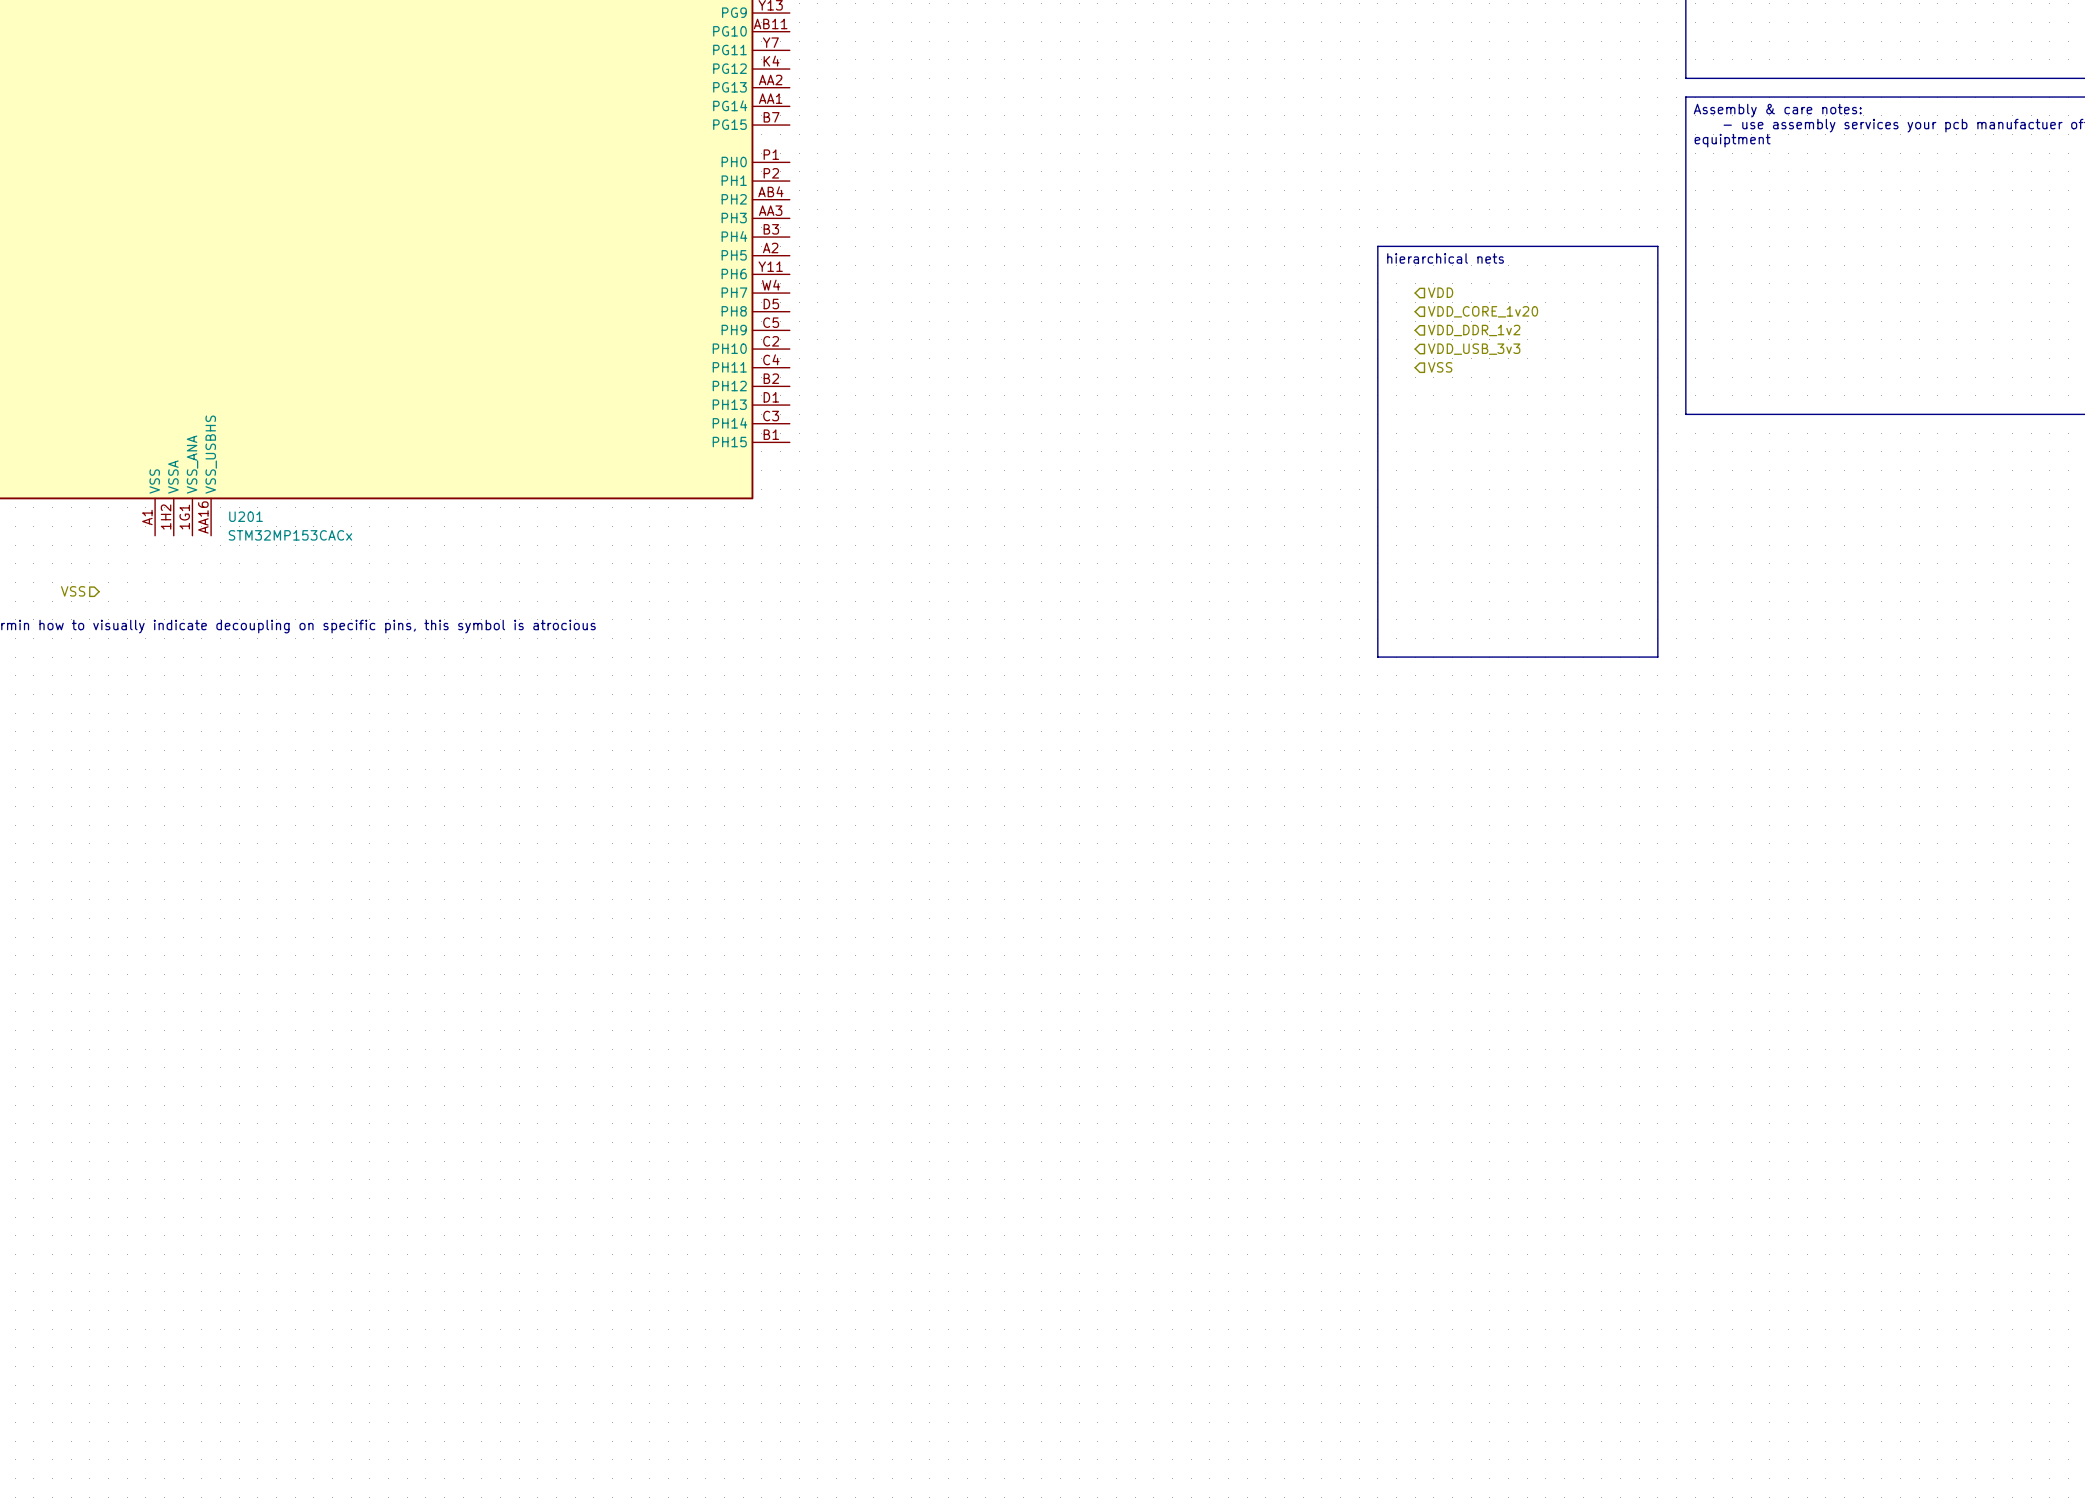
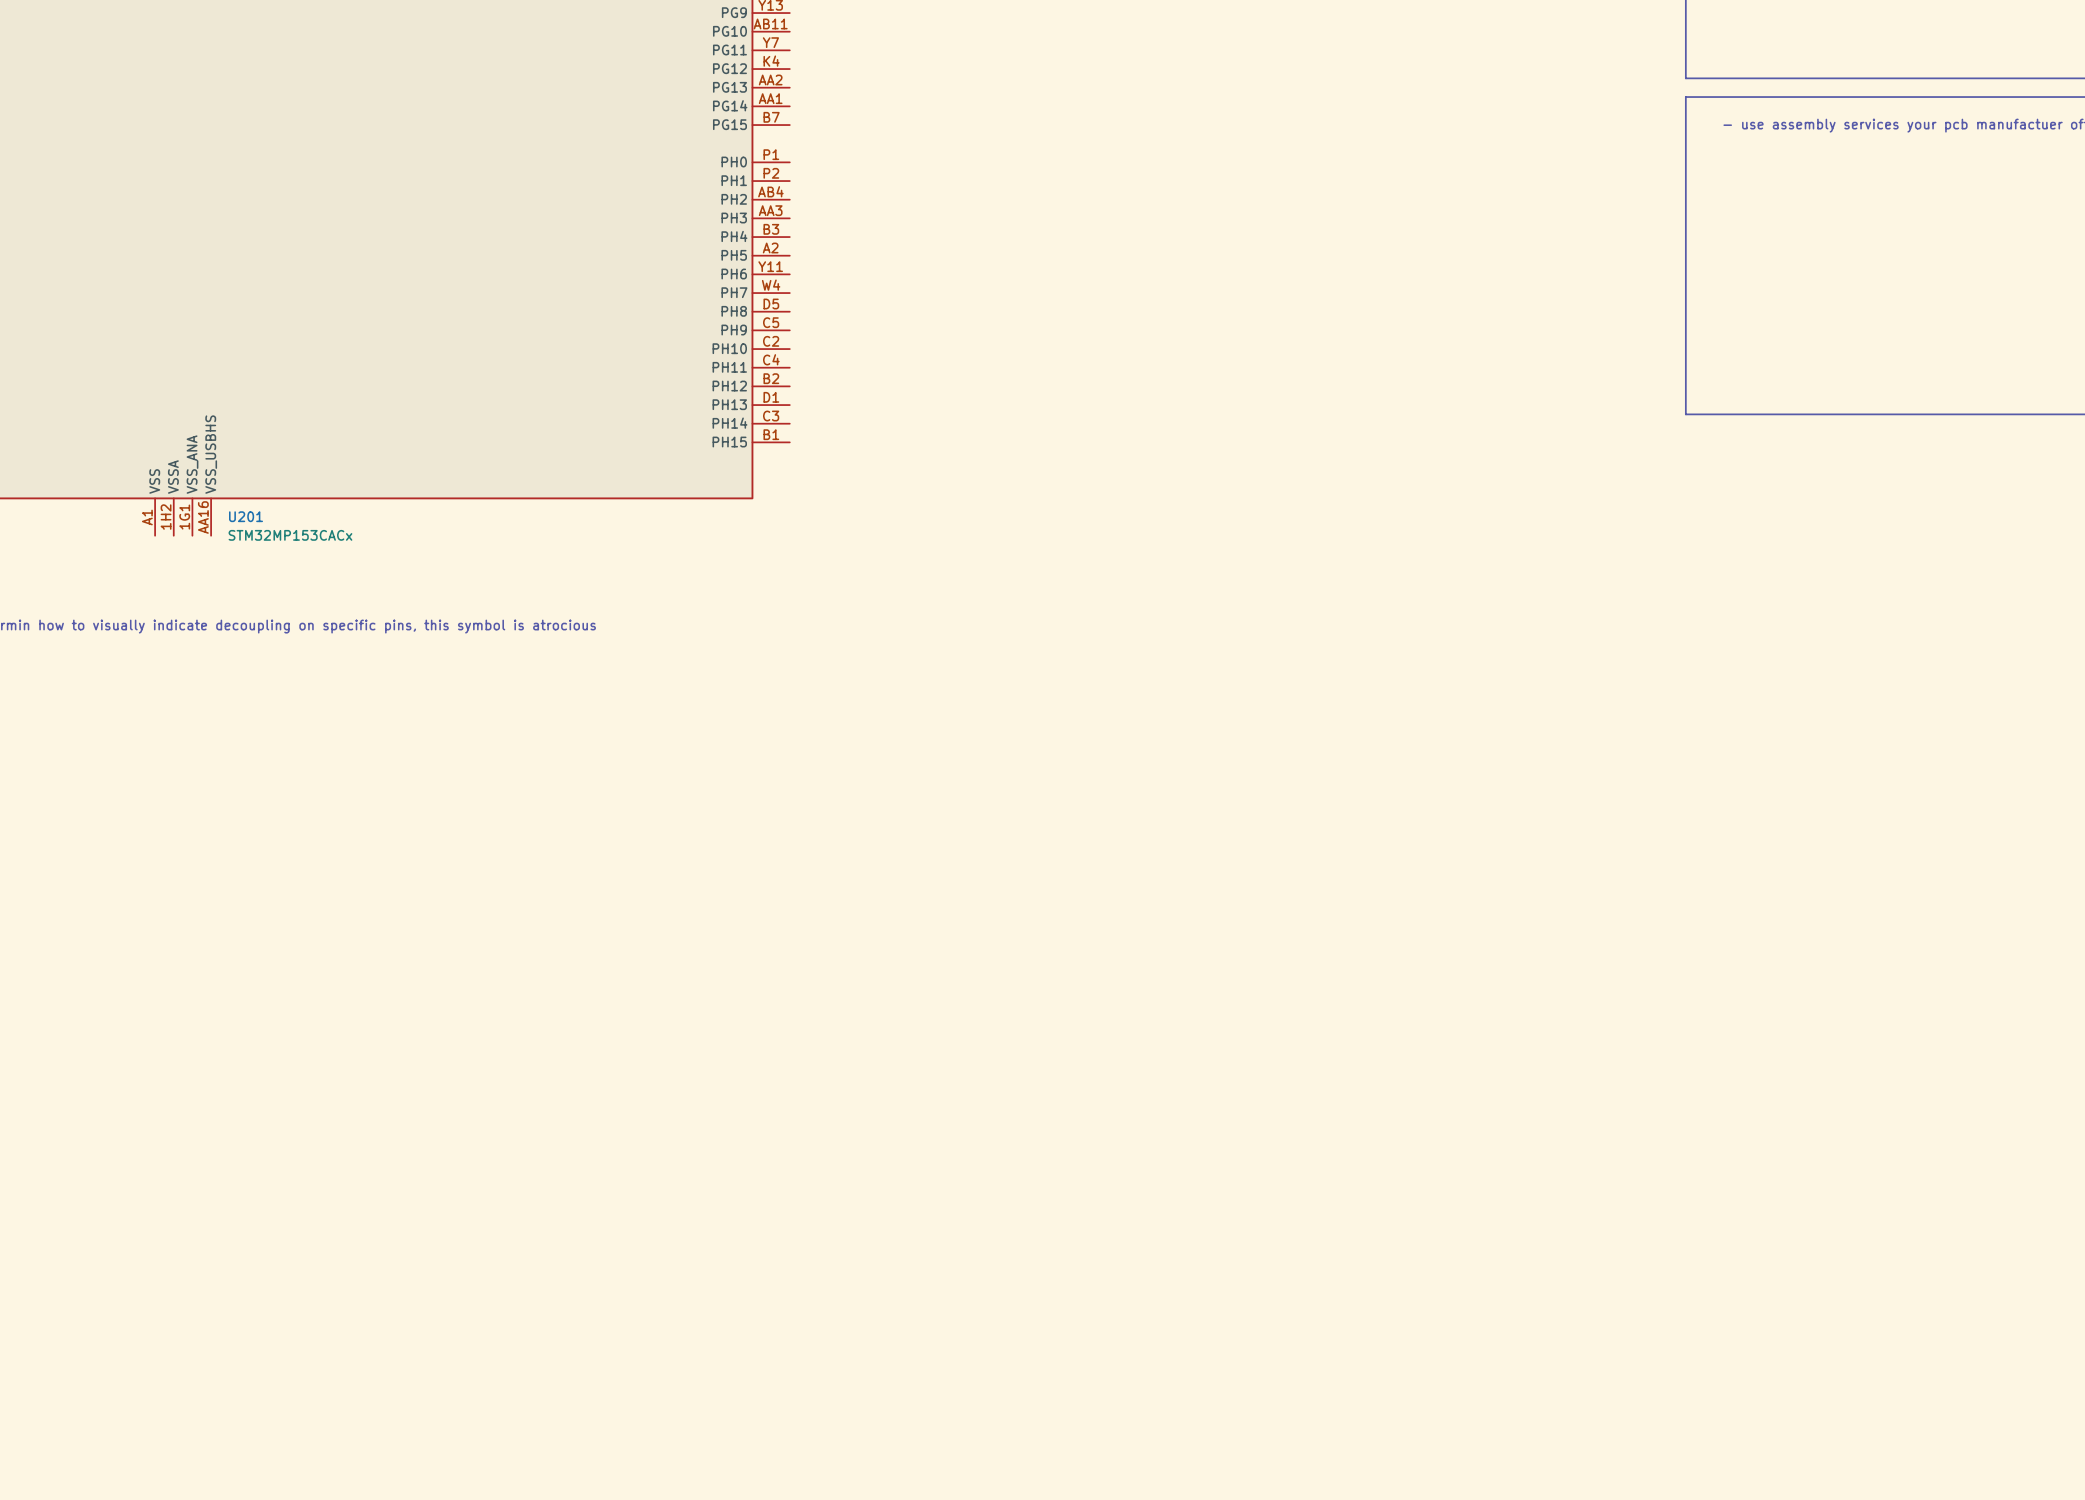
text: Assembly & care notes: (1777, 110) -> none
text: equiptment (1732, 140) -> none
line: (1377, 246) (1657, 246) (1657, 657) (1377, 657) (1377, 246) -> none
text: hierarchical nets (1445, 258) -> none
hierarchical label: VDD (1440, 292) -> none
hierarchical label: VDD_CORE_1v20 (1483, 311) -> none
hierarchical label: VDD_DDR_1v2 (1474, 330) -> none
hierarchical label: VDD_USB_3v3 (1474, 349) -> none
hierarchical label: VSS (1440, 367) -> none
hierarchical label: VSS (73, 591) -> none

